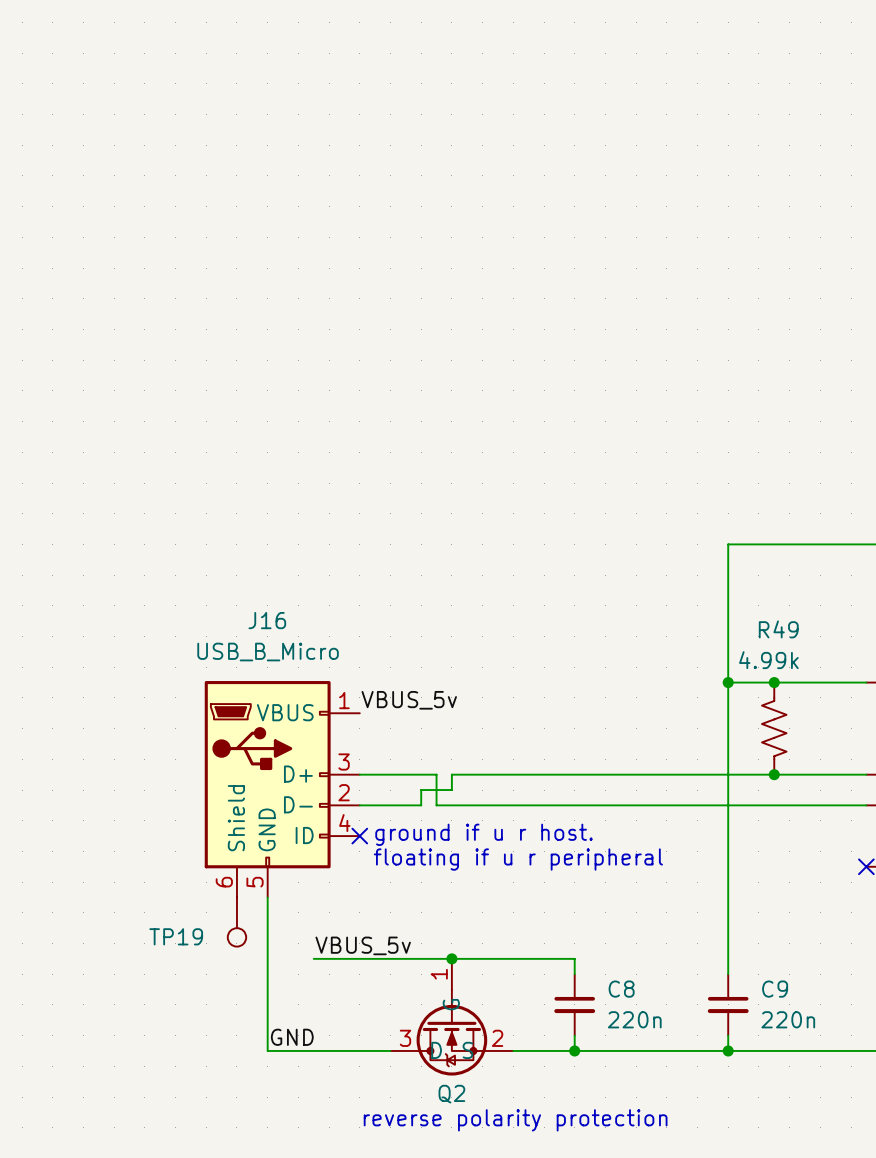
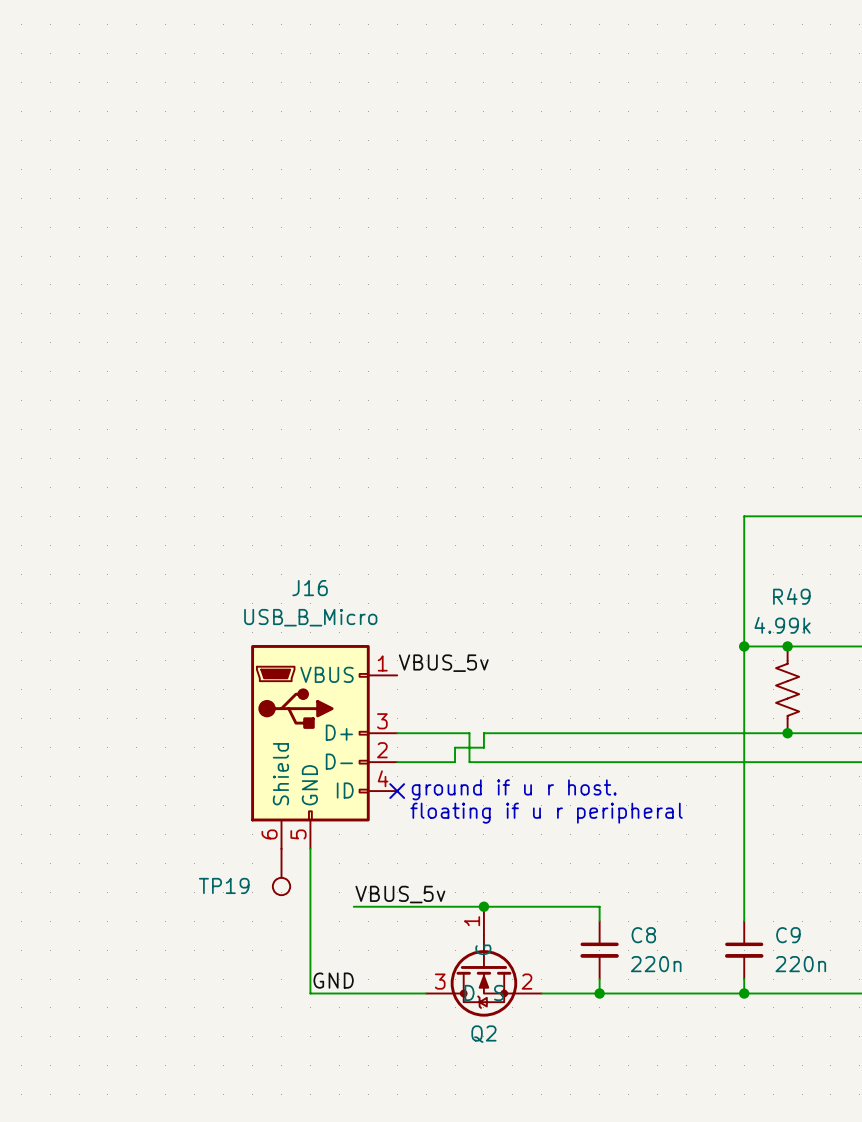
text: reverse polarity protection (515, 1120) -> none

